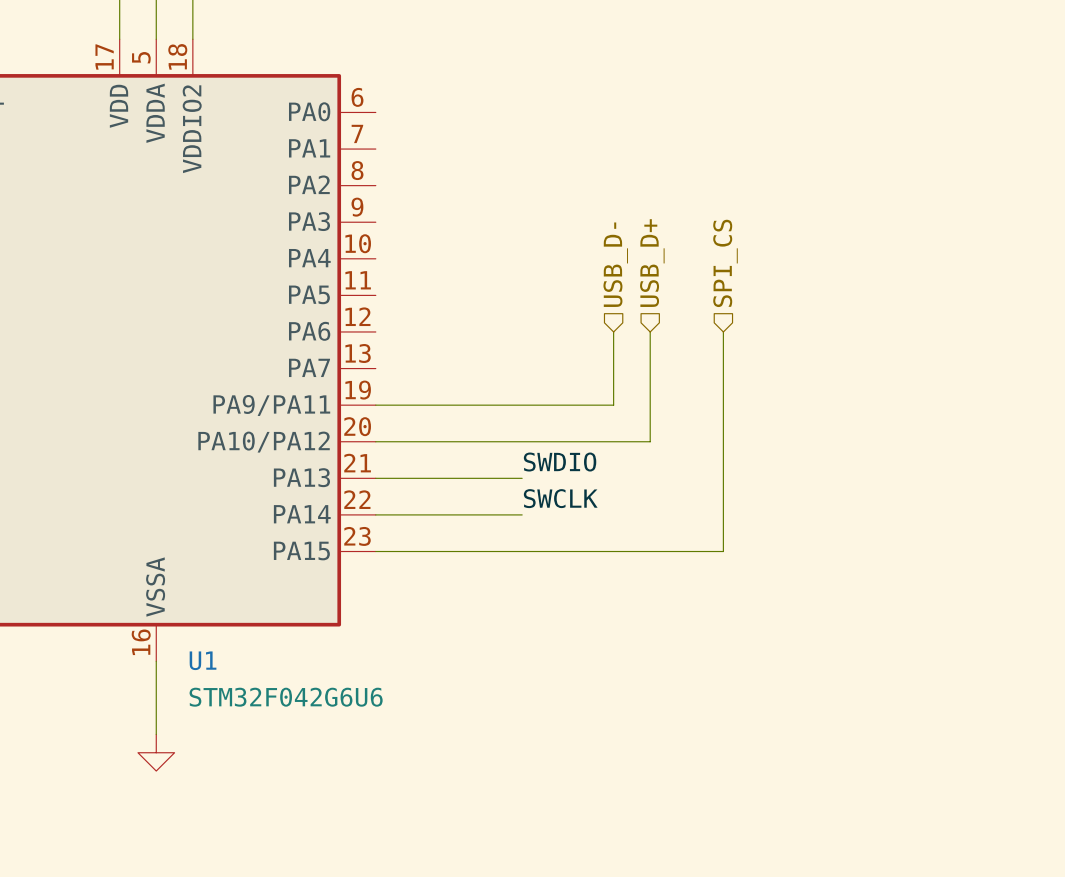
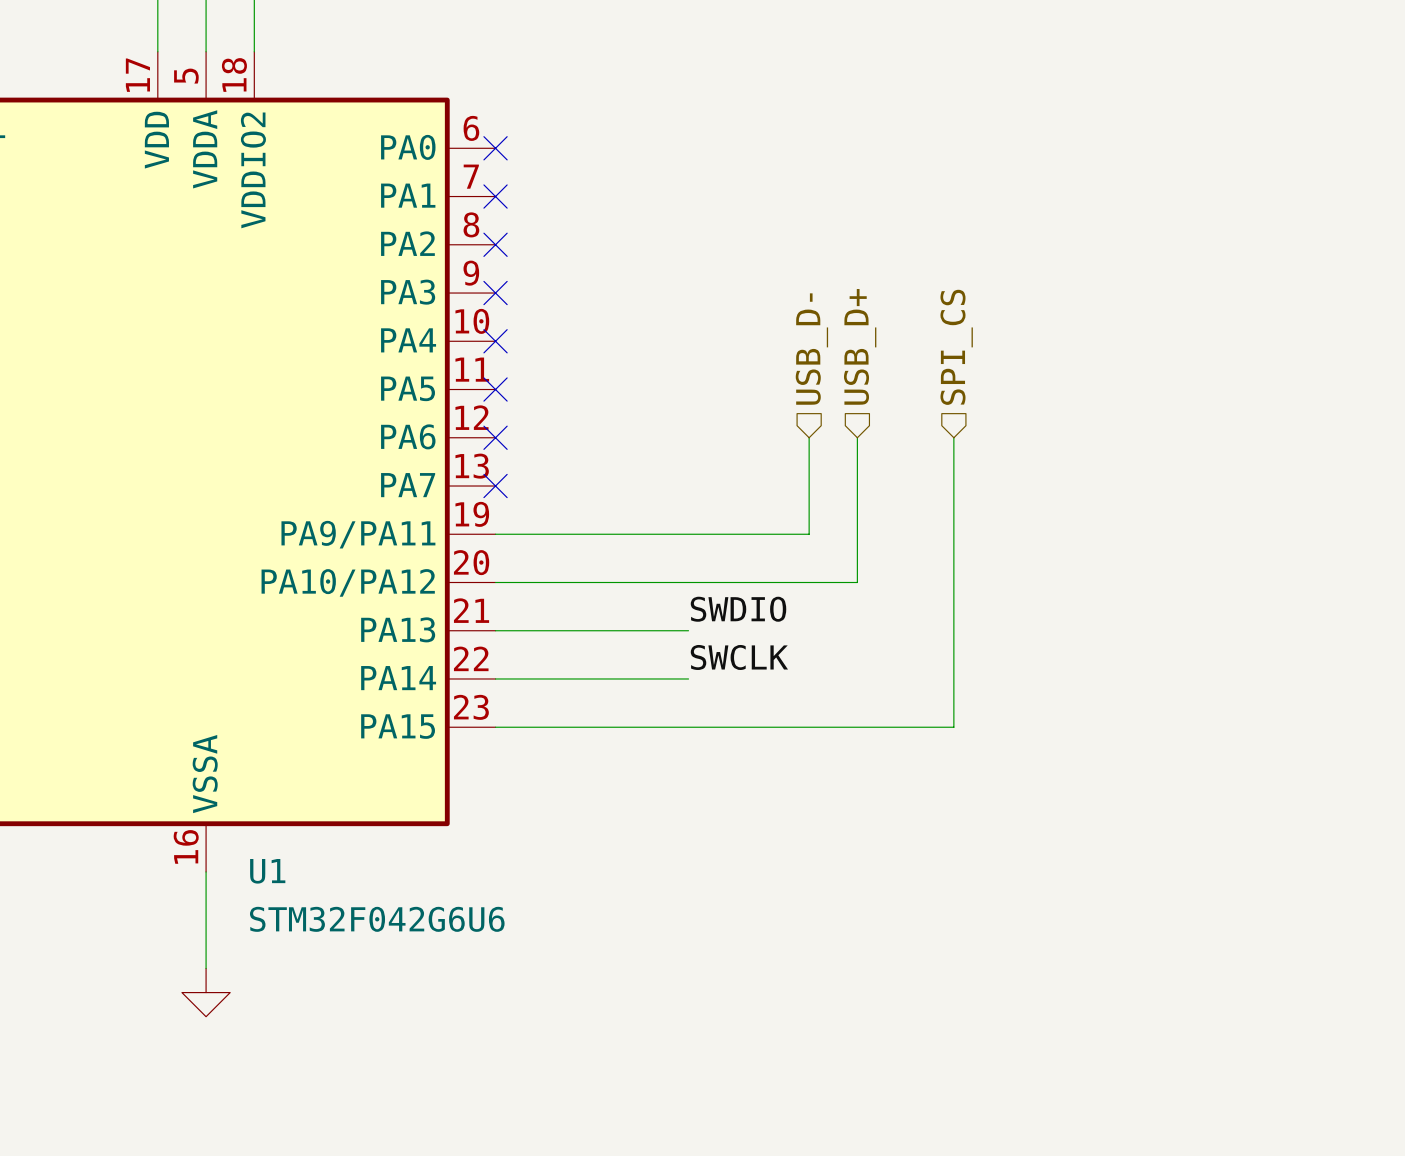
no-connect mark: none -> (495, 148)
no-connect mark: none -> (495, 196)
no-connect mark: none -> (495, 244)
no-connect mark: none -> (495, 293)
no-connect mark: none -> (495, 341)
no-connect mark: none -> (495, 389)
no-connect mark: none -> (495, 437)
no-connect mark: none -> (495, 486)

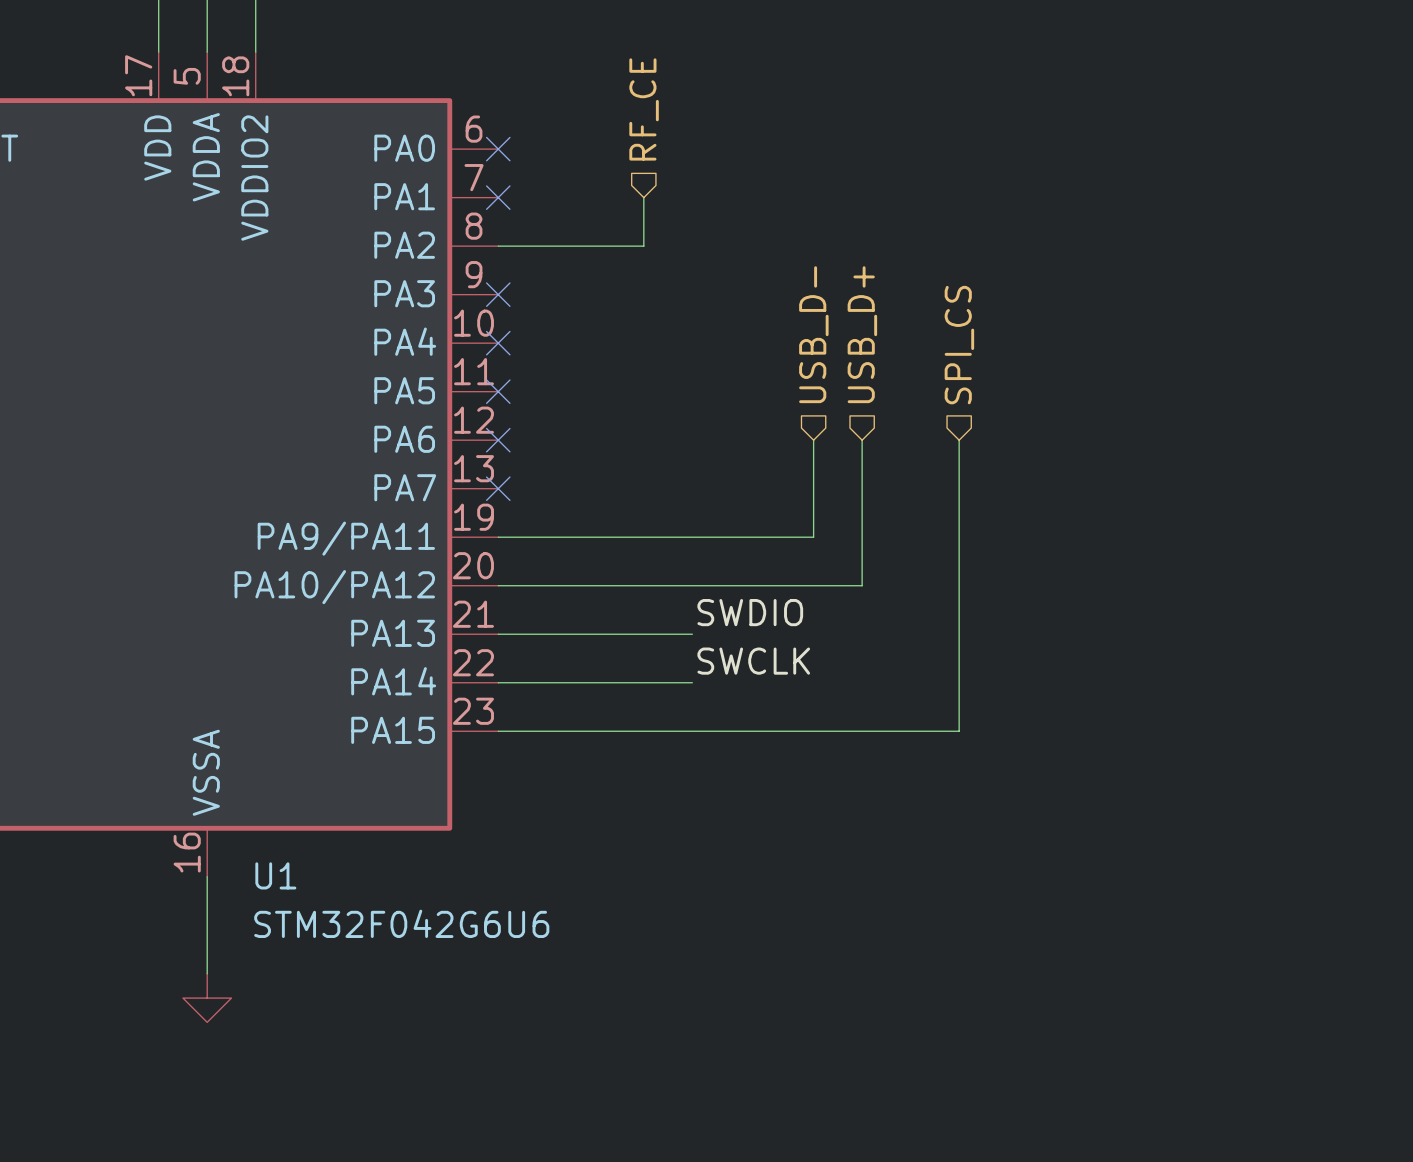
hierarchical label: none -> RF_CE (644, 109)
wire: none -> (643, 197) (643, 246) (498, 246)
no-connect mark: (495, 244) -> none

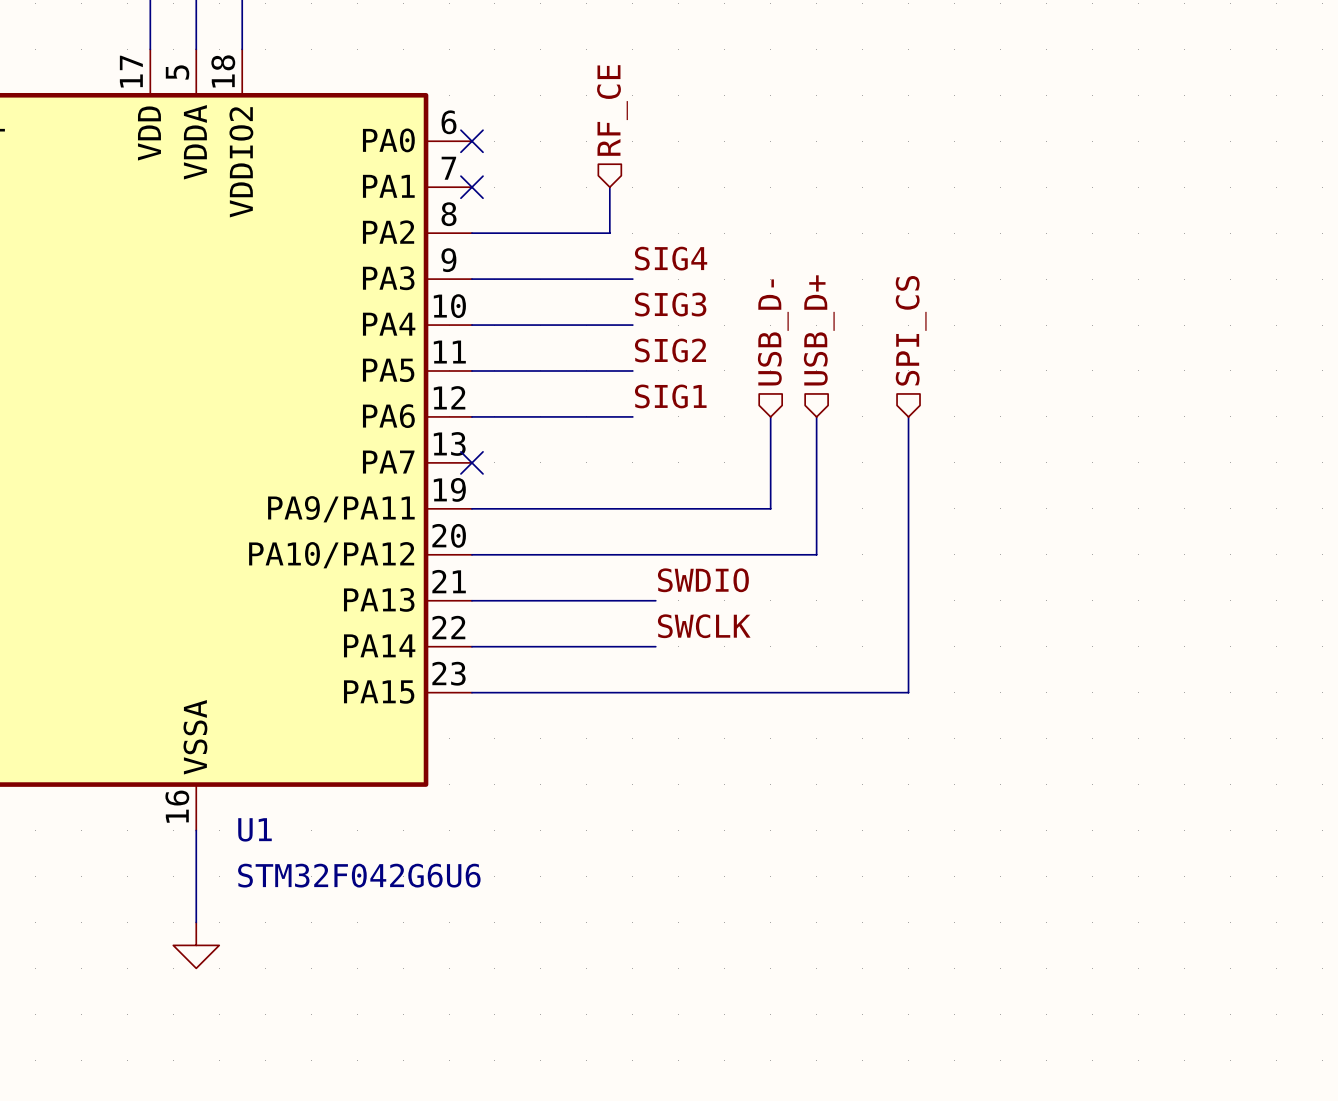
label: none -> SIG4 (671, 258)
wire: none -> (471, 279) (632, 279)
no-connect mark: (498, 294) -> none
label: none -> SIG3 (670, 304)
wire: none -> (471, 325) (632, 325)
no-connect mark: (498, 343) -> none
label: none -> SIG2 (670, 350)
wire: none -> (471, 370) (632, 370)
no-connect mark: (498, 391) -> none
label: none -> SIG1 (670, 396)
wire: none -> (471, 416) (632, 416)
no-connect mark: (498, 440) -> none

